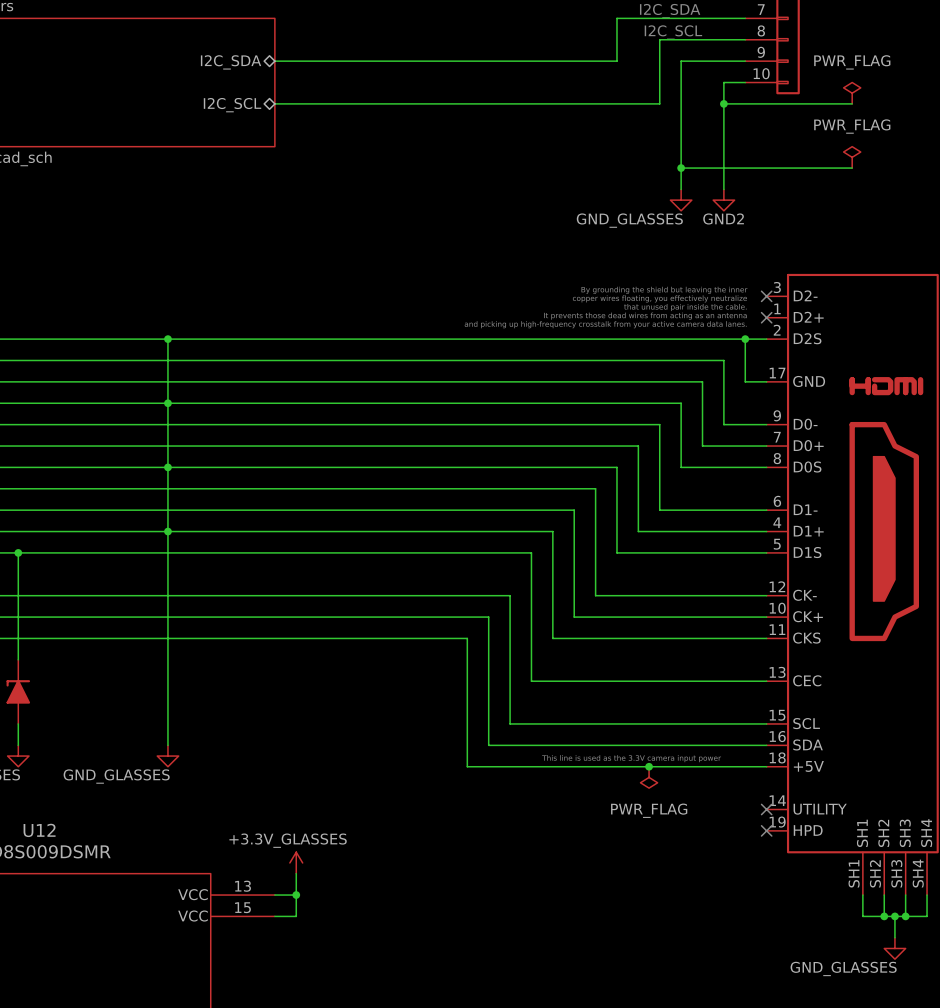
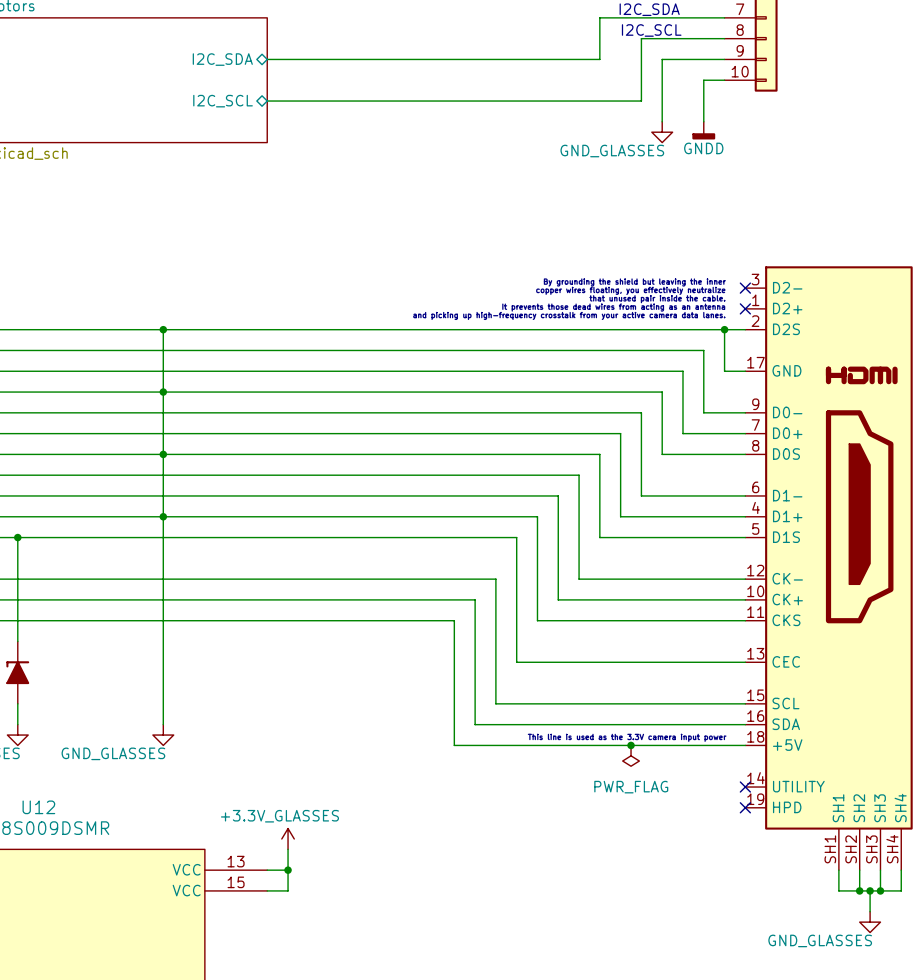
power symbol: PWR_FLAG (852, 93) -> none
wire: (723, 103) (852, 103) -> none
junction: (723, 103) -> none
wire: (681, 125) (681, 189) -> none
wire: (723, 125) (723, 189) -> none
power symbol: none -> GNDD (703, 130)
power symbol: PWR_FLAG (852, 157) -> none
wire: (681, 168) (852, 168) -> none
junction: (681, 168) -> none
power symbol position: GND_GLASSES (681, 200) -> GND_GLASSES (662, 132)
power symbol: GND2 (723, 200) -> none

